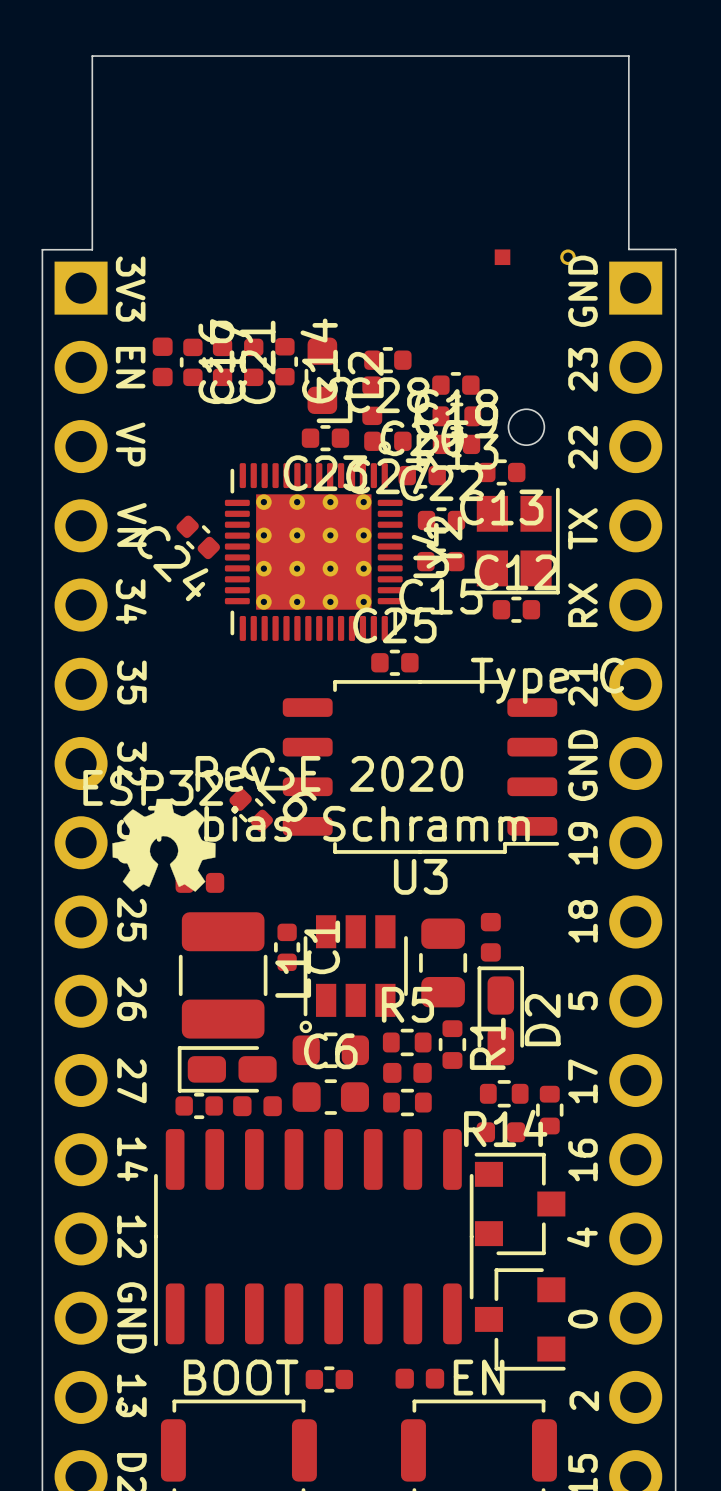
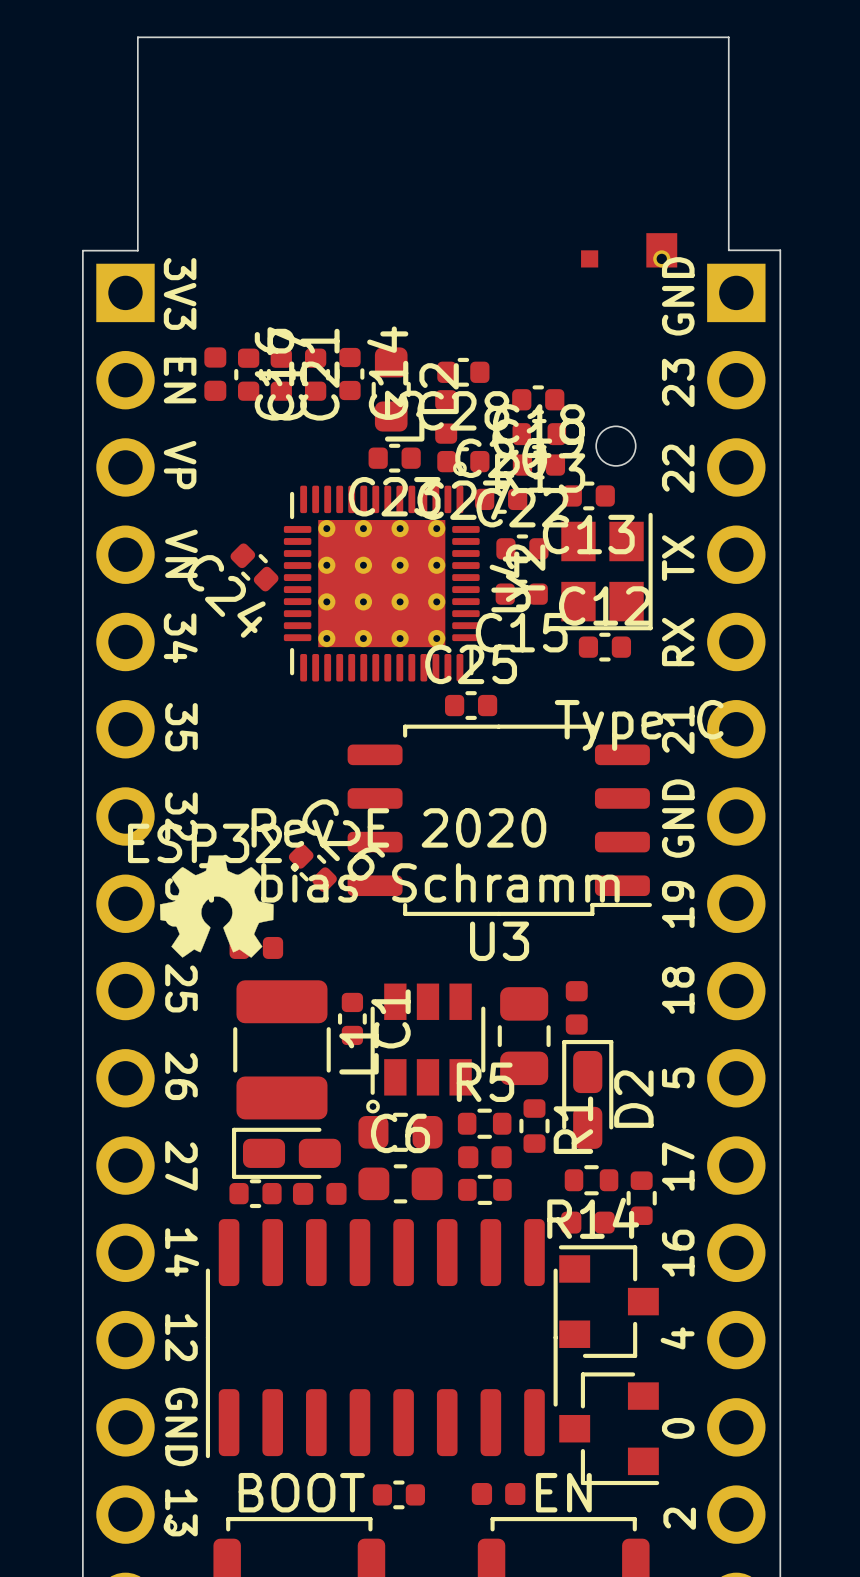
part footprint: [494, 249, 576, 266] -> [581, 233, 678, 268]

